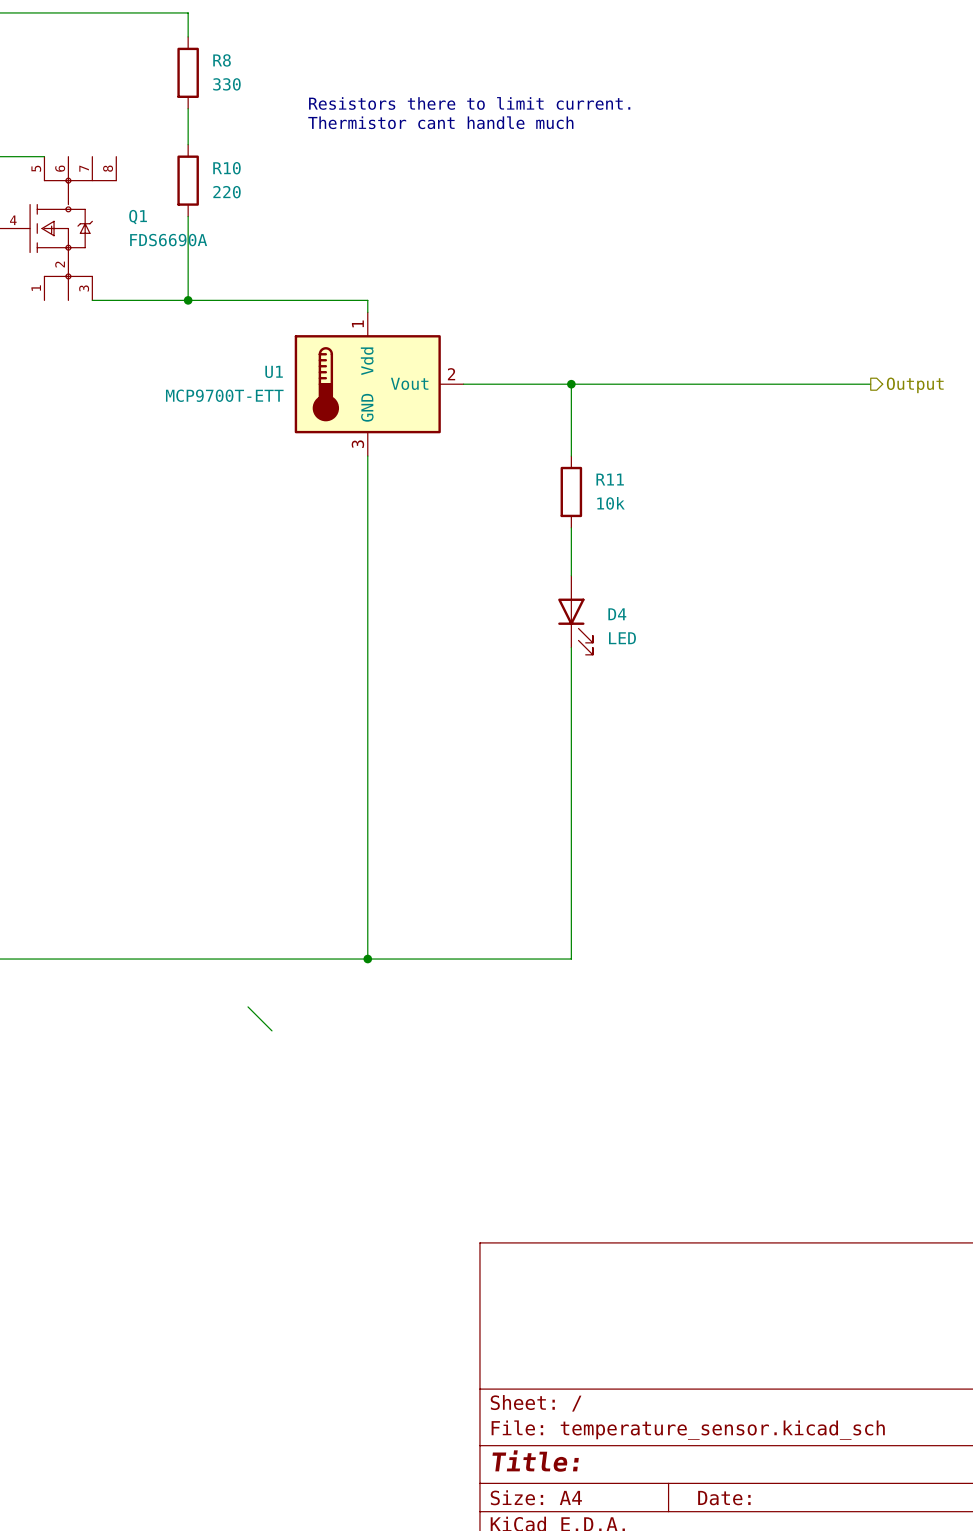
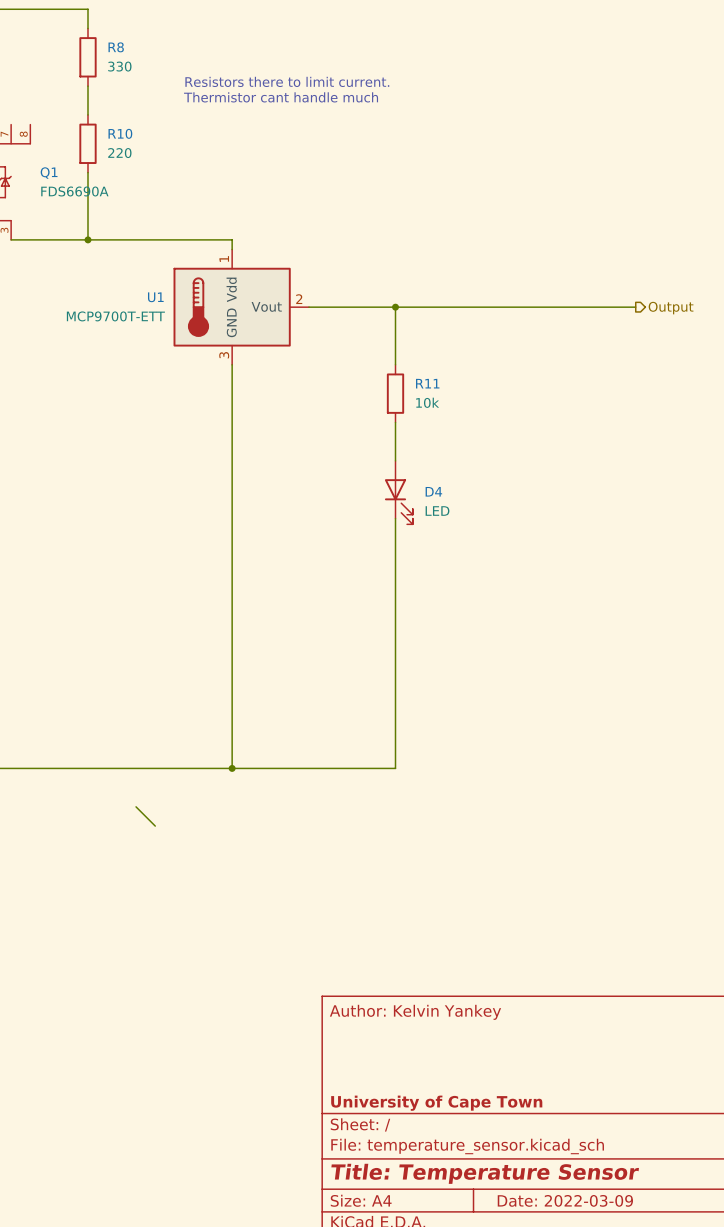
title block: none -> Author: Kelvin Yankey (415, 1012)
title block: none -> University of Cape Town (436, 1103)
title block: Title: (535, 1461) -> Title: Temperature Sensor (485, 1173)
title block: Date: (724, 1498) -> Date: 2022-03-09 (565, 1200)

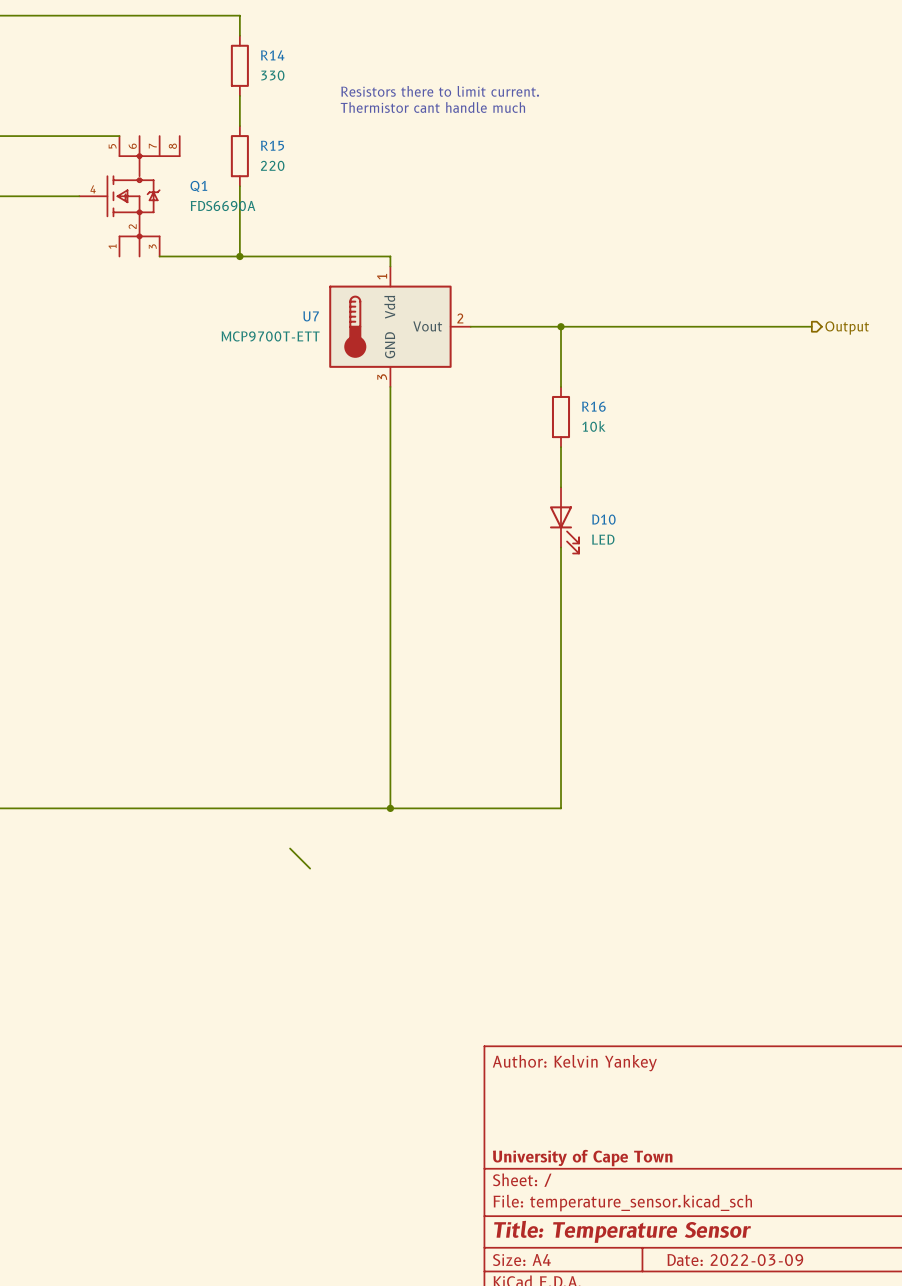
R8 name: R8 (116, 47) -> R14 (272, 55)
R10 name: R10 (120, 133) -> R15 (272, 145)
U1 name: U1 (155, 297) -> U7 (311, 316)
R11 name: R11 (427, 383) -> R16 (593, 406)
D4 name: D4 (433, 491) -> D10 (603, 519)

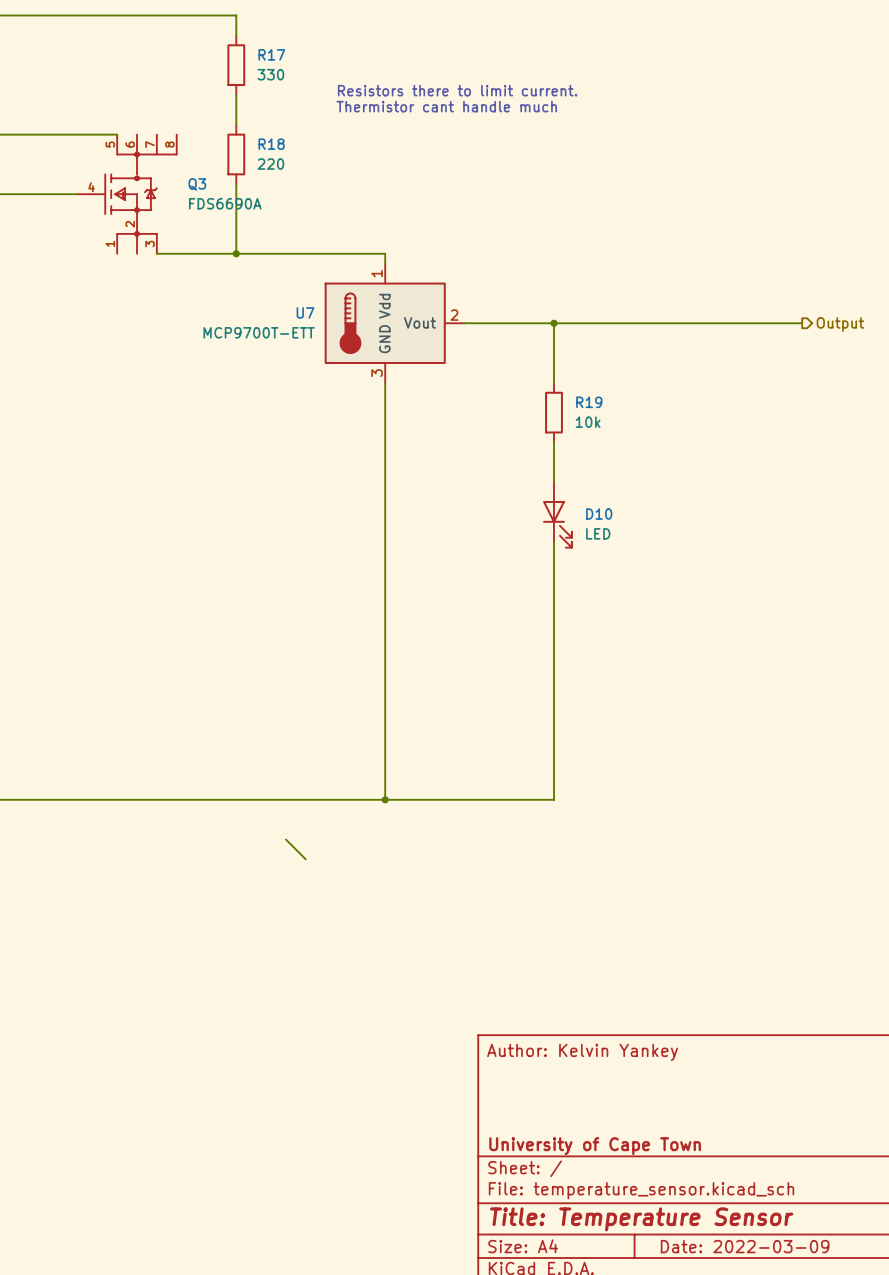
R14 name: R14 (272, 55) -> R17 (271, 54)
R15 name: R15 (272, 145) -> R18 (271, 144)
Q1 name: Q1 (198, 186) -> Q3 (197, 184)
R16 name: R16 (593, 406) -> R19 (589, 402)

